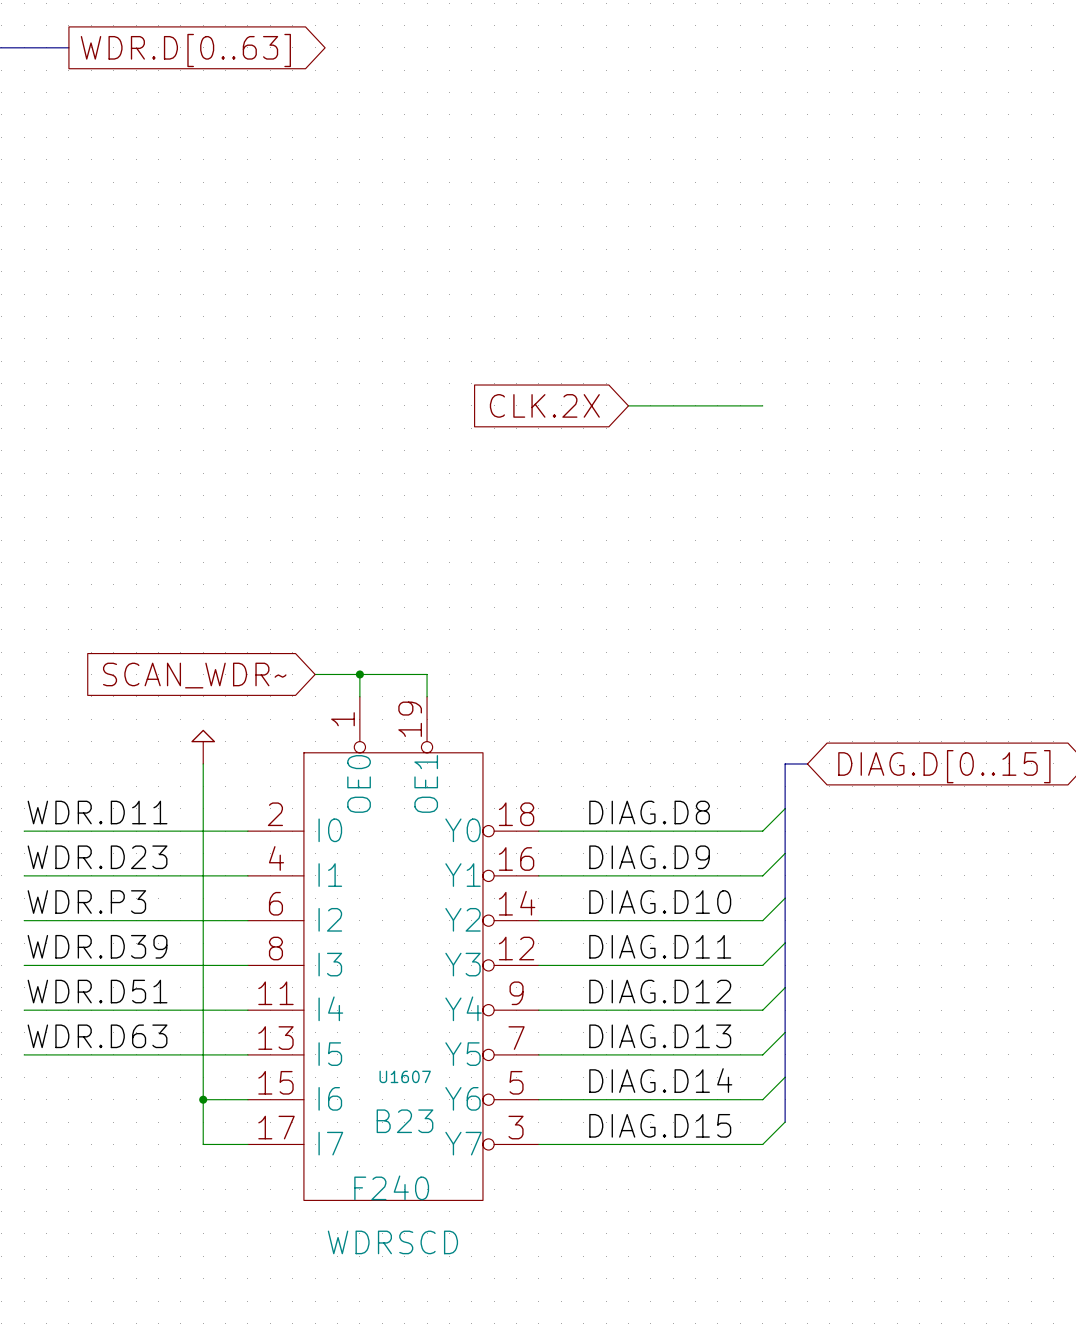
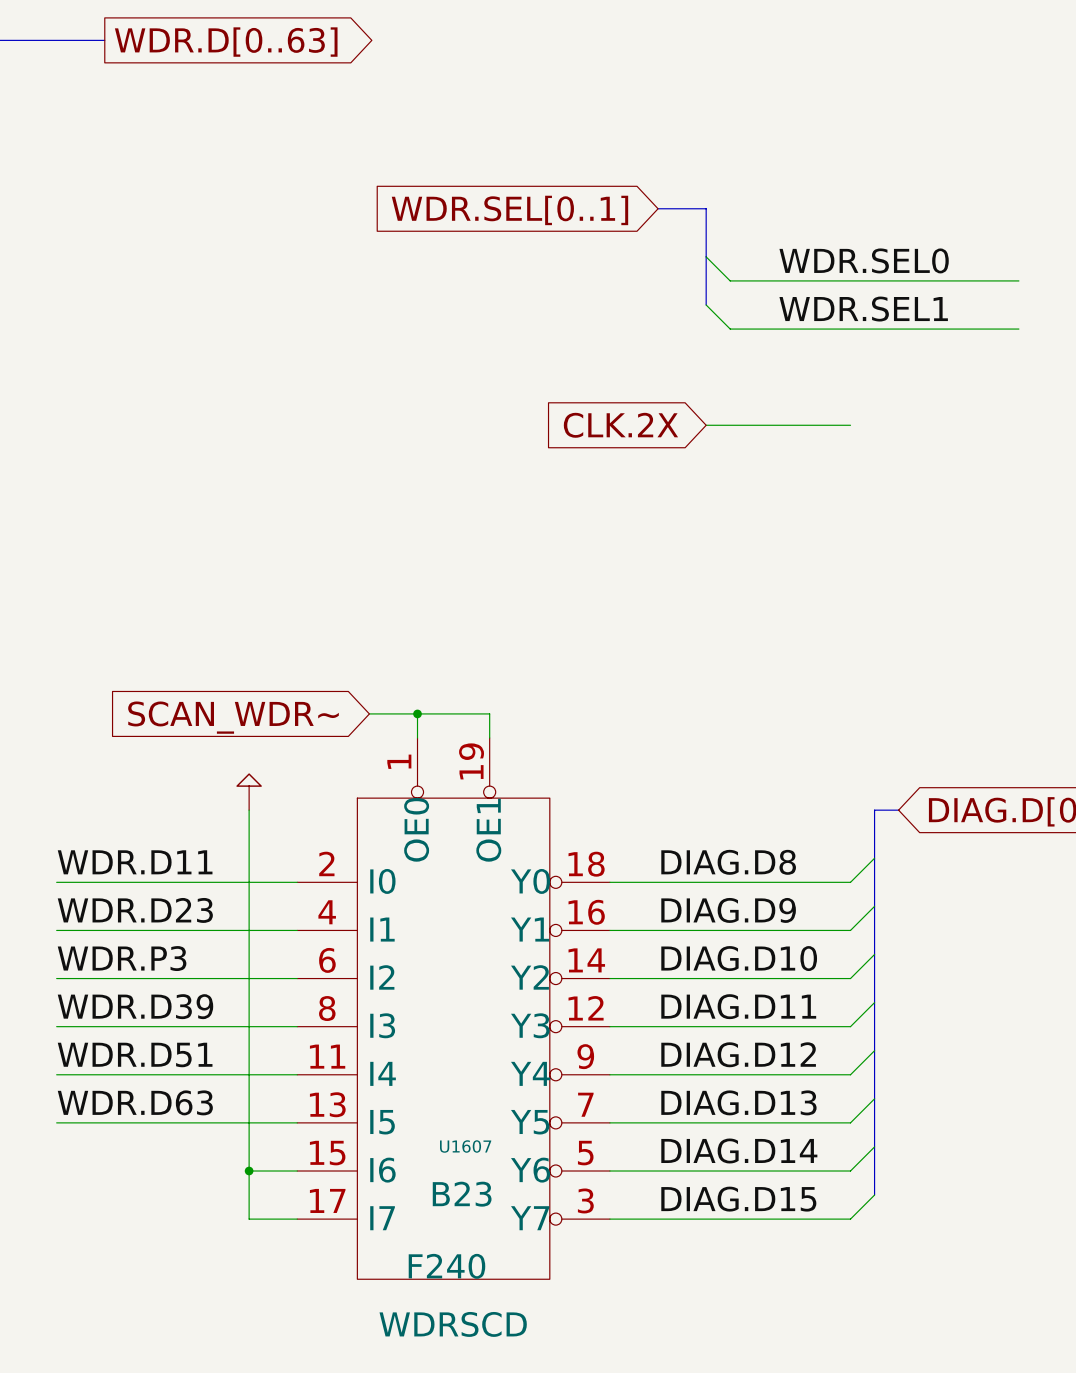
bus: none -> (658, 208) (706, 208) (706, 304)
global label: none -> WDR.SEL[0..1] (509, 210)
wire: none -> (706, 256) (730, 280) (1018, 280)
label: none -> WDR.SEL0 (864, 260)
wire: none -> (706, 304) (730, 329) (1018, 329)
label: none -> WDR.SEL1 (863, 309)

